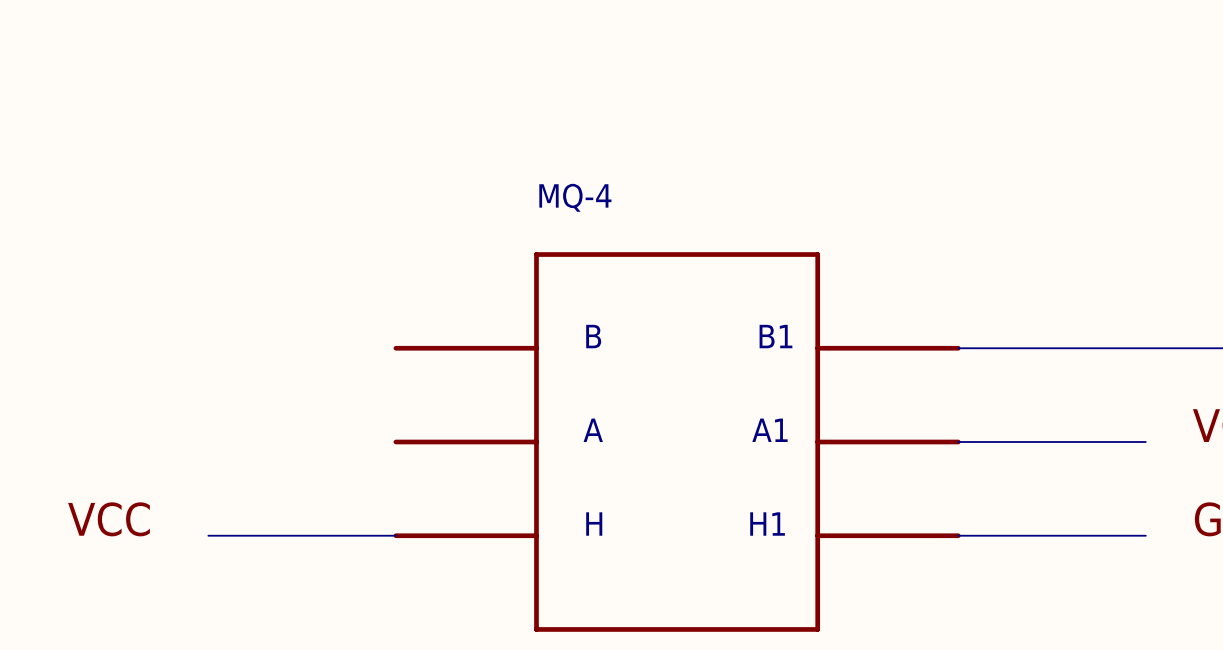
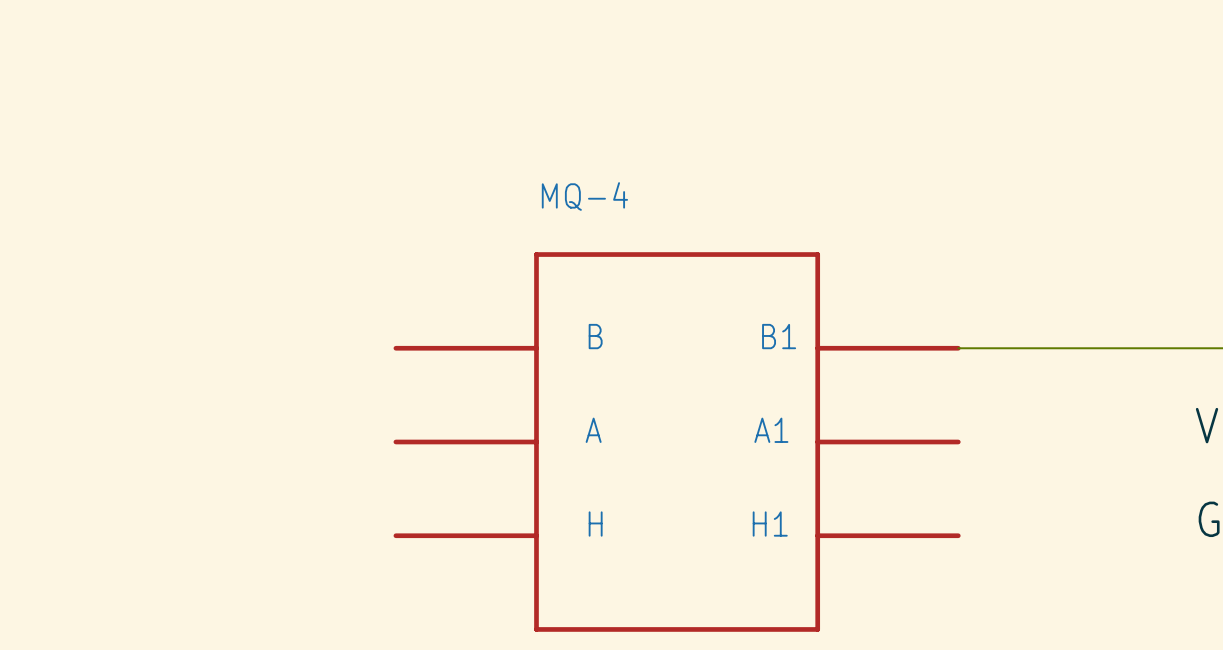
wire: (958, 441) (1145, 441) -> none
label: VCC (109, 519) -> none
wire: (208, 535) (395, 535) -> none
wire: (958, 535) (1145, 535) -> none

